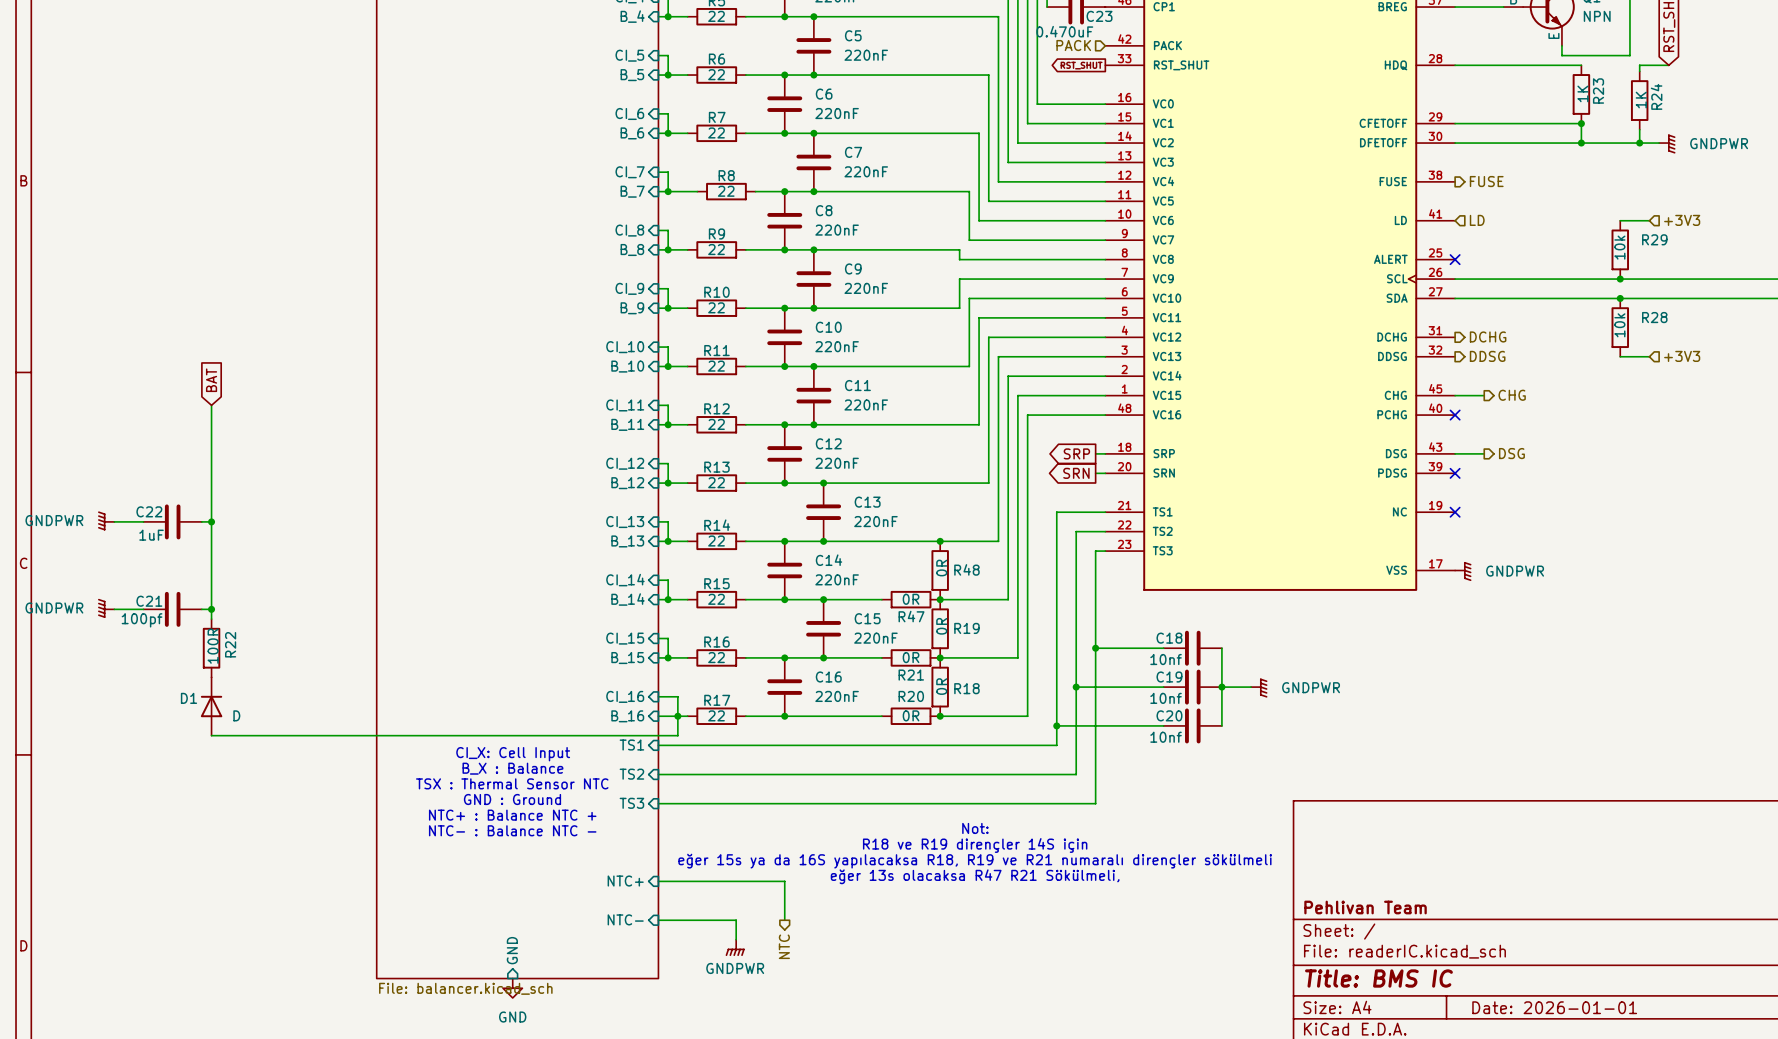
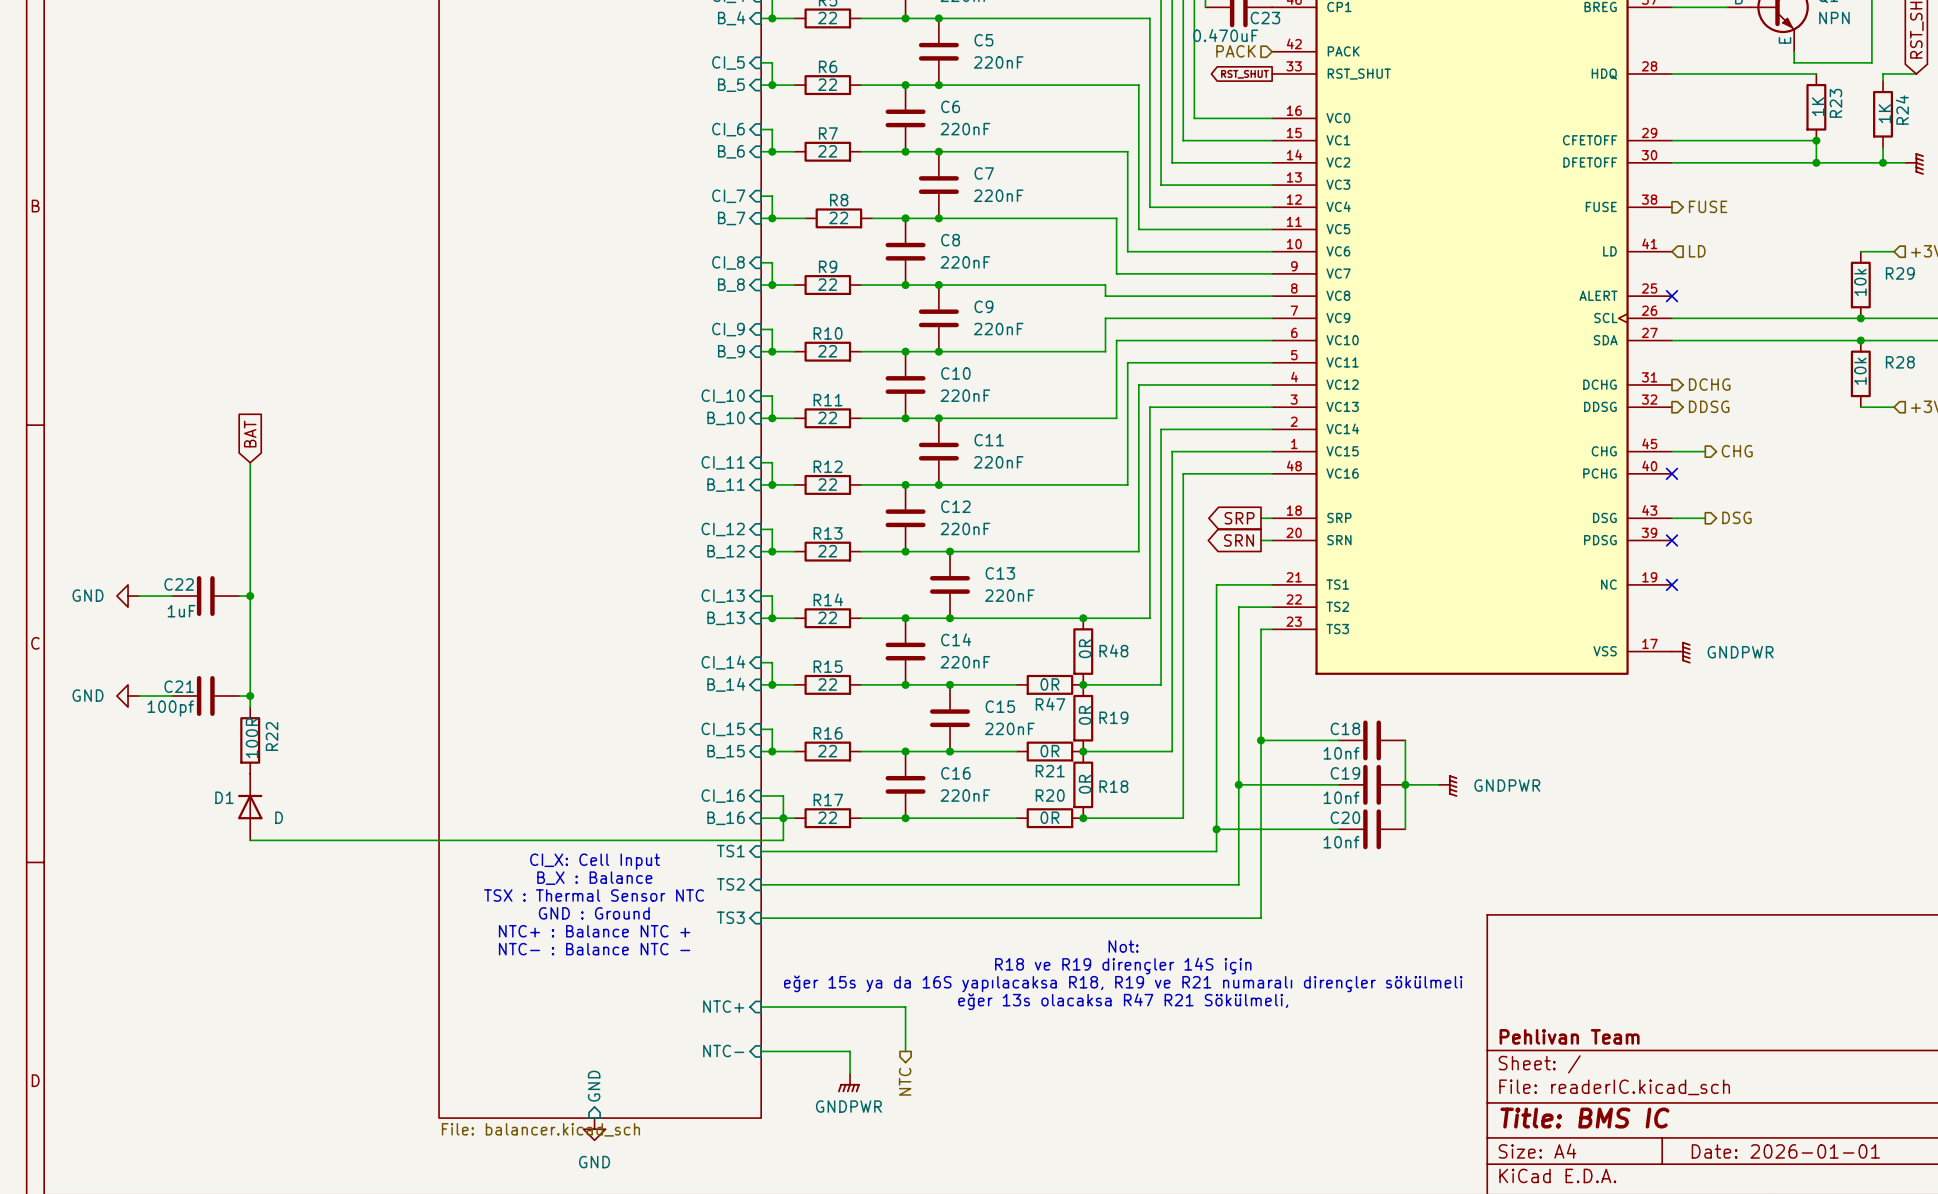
power symbol: GNDPWR (106, 520) -> GND (128, 596)
power symbol: GNDPWR (106, 608) -> GND (128, 696)

